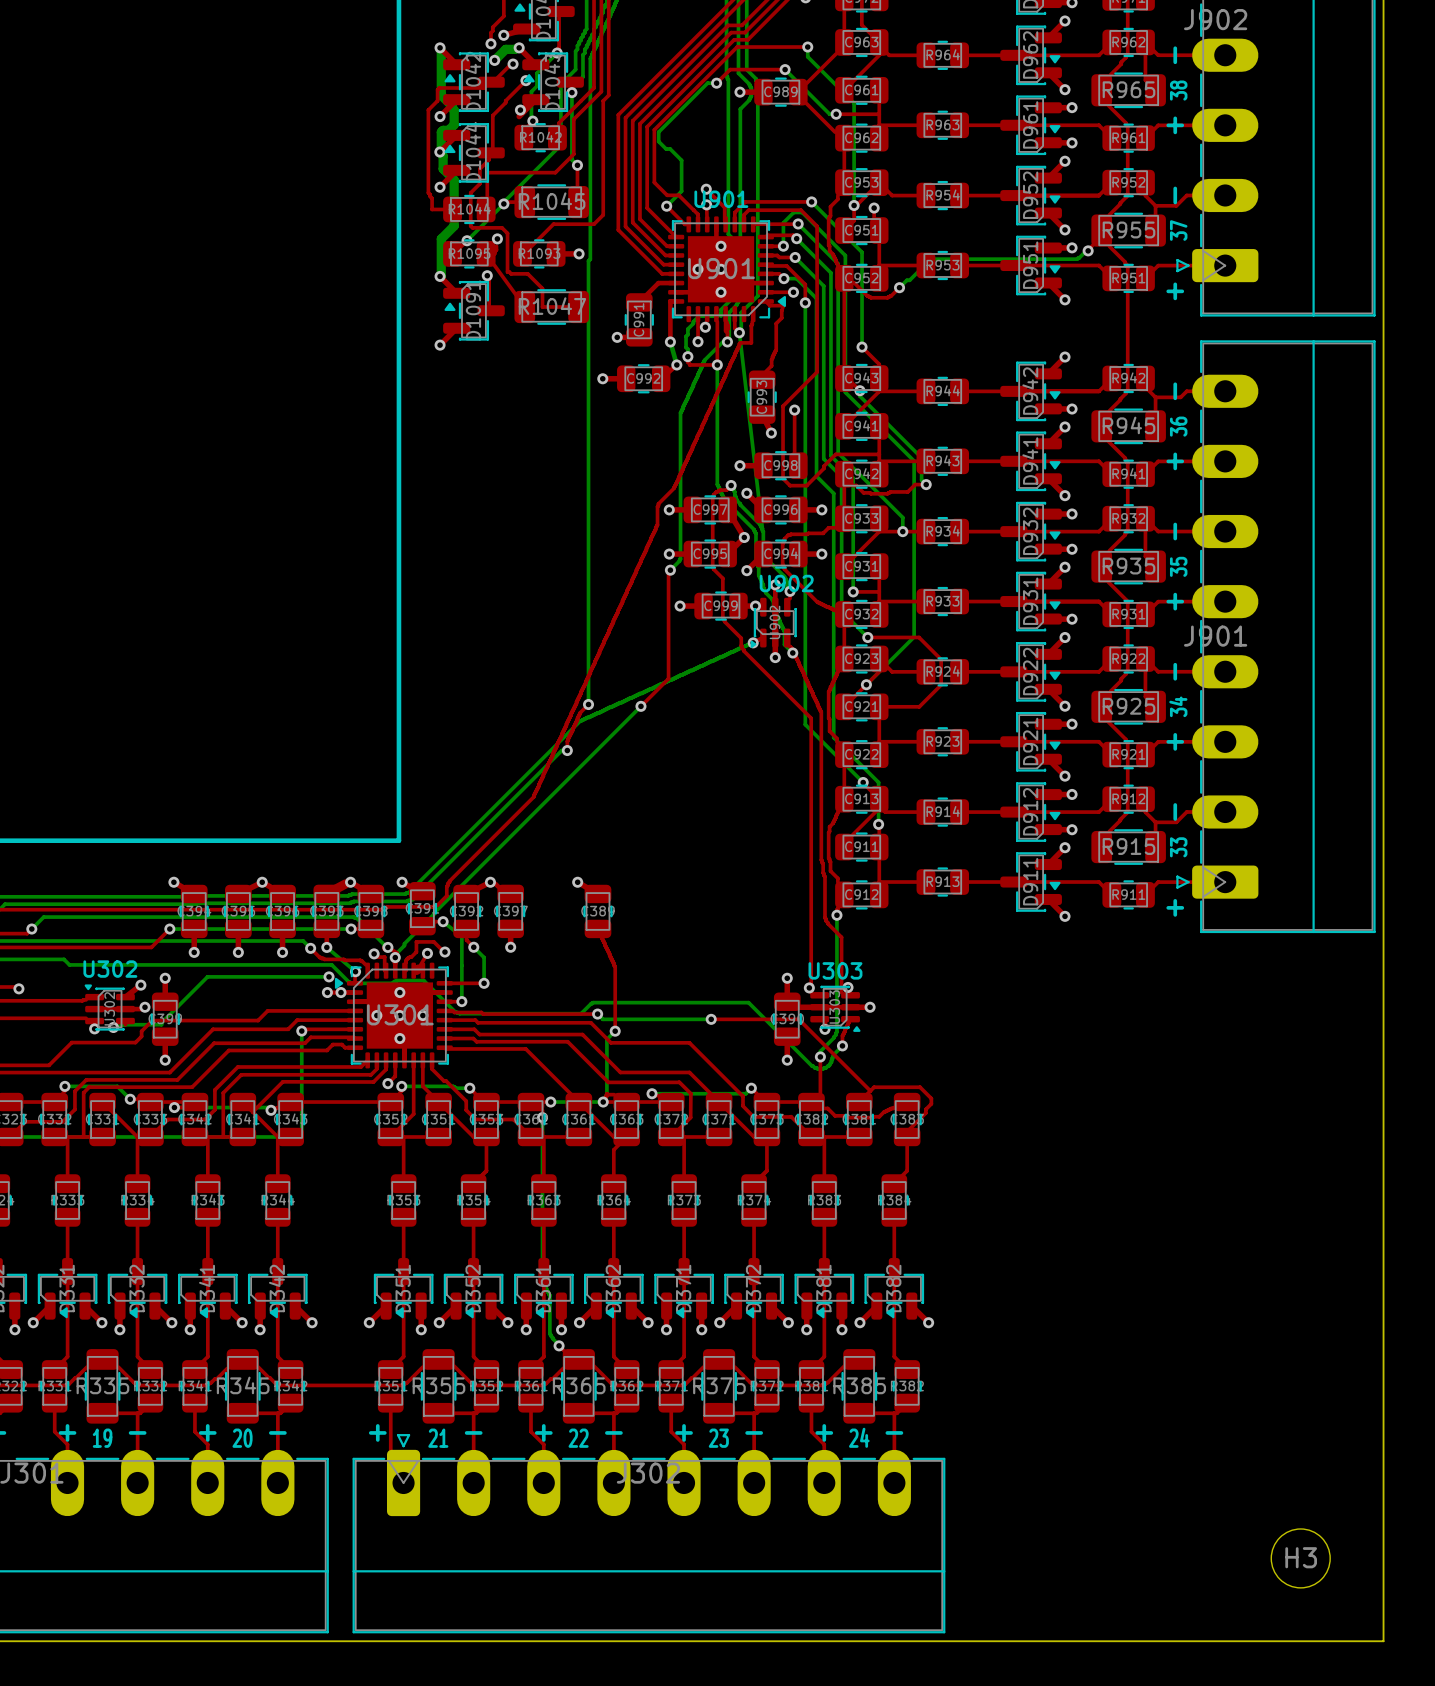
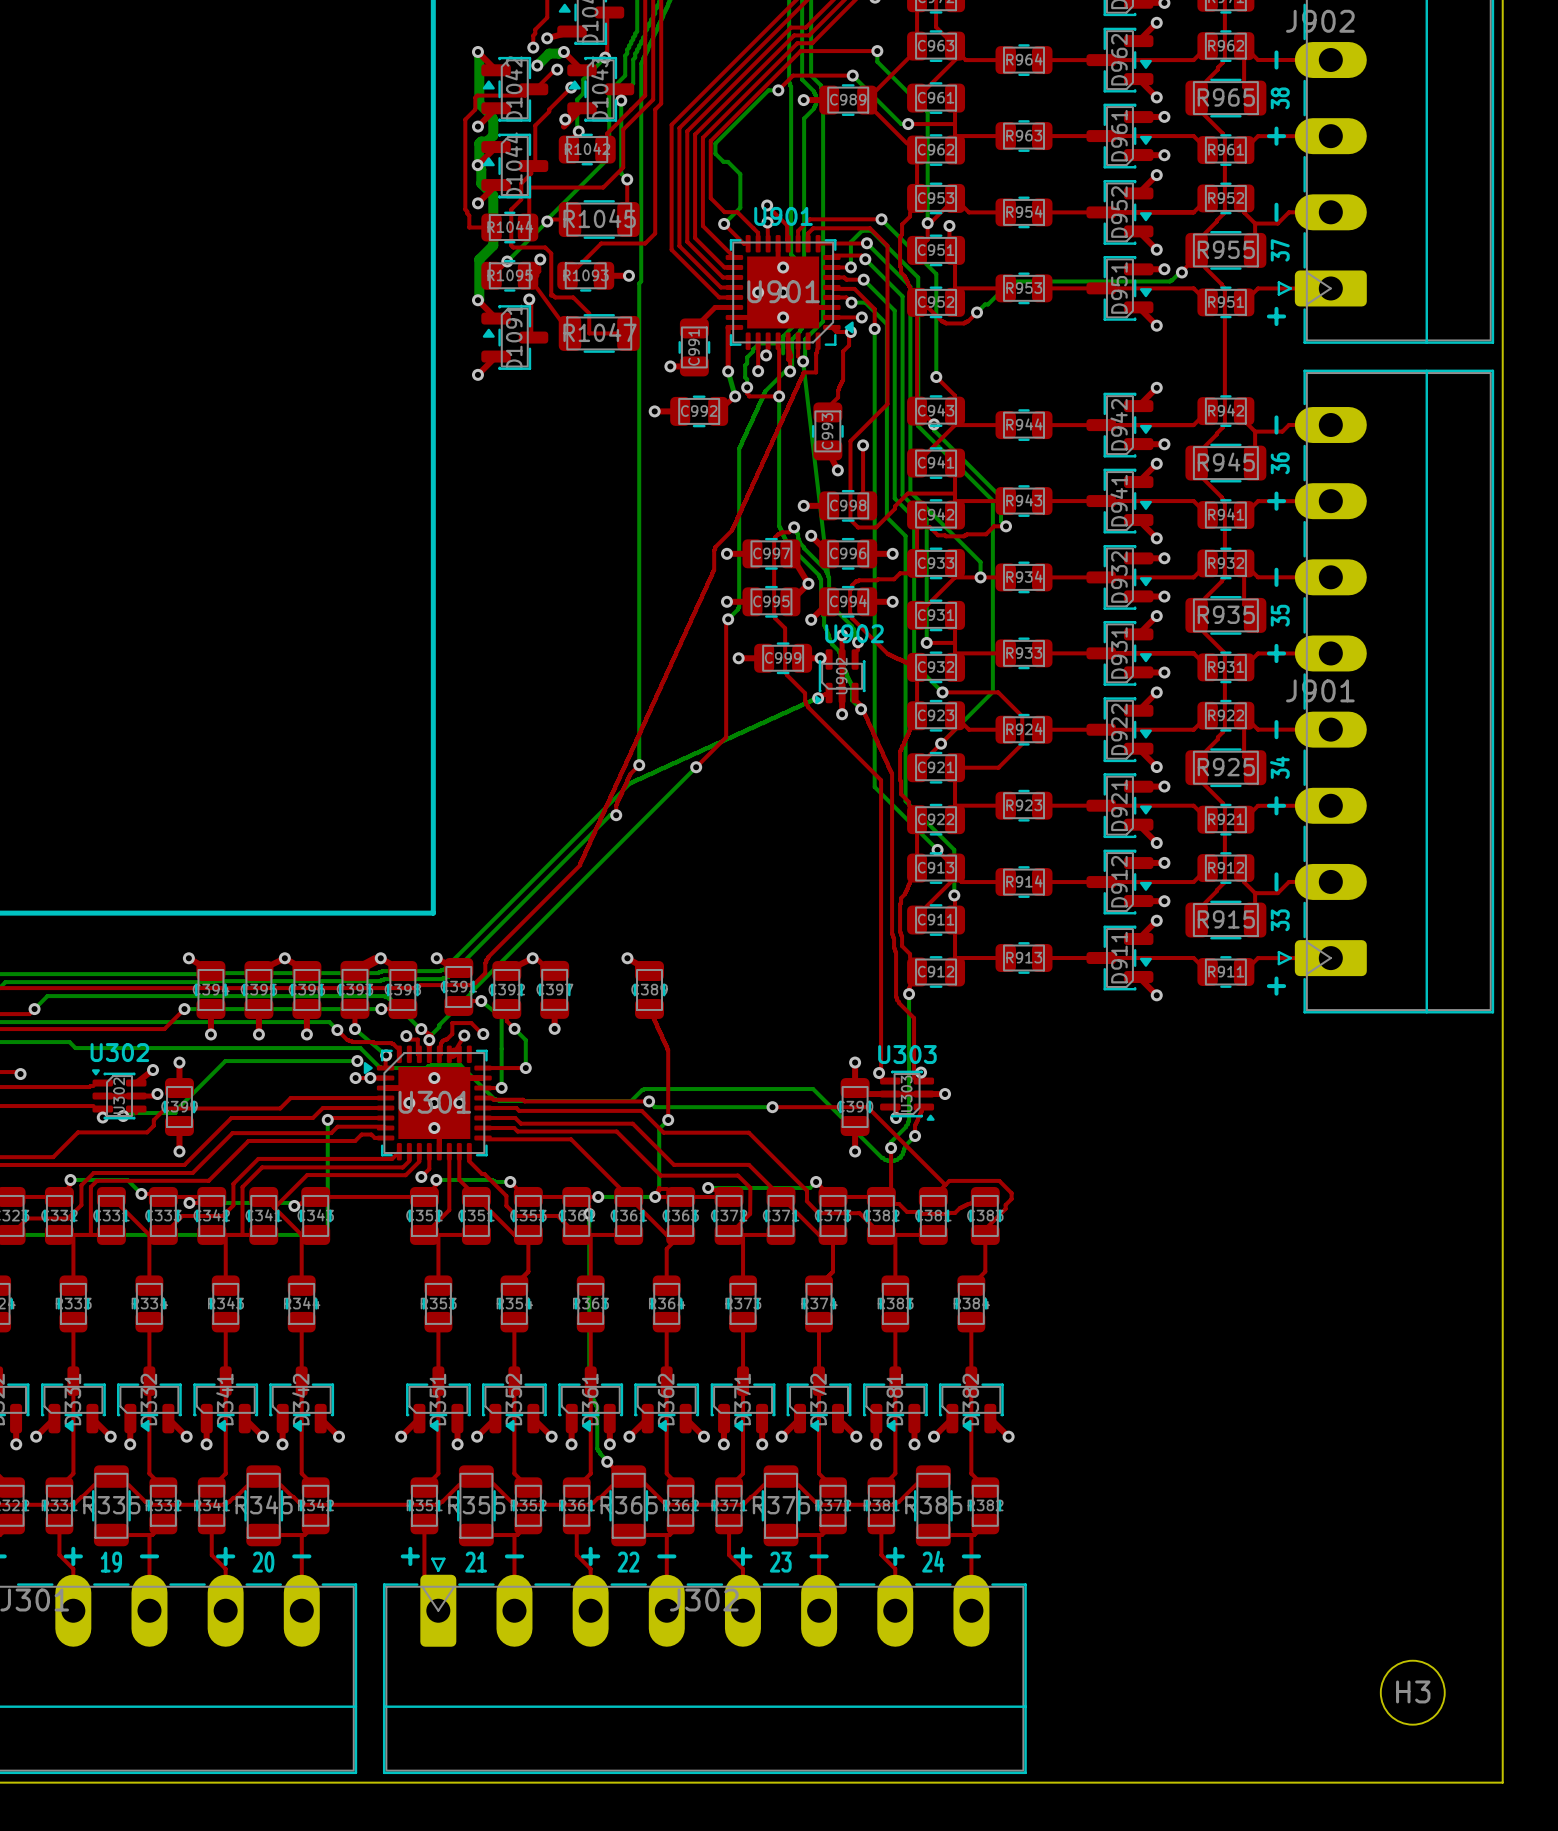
via: none -> (850, 332)
bottom track: none -> (783, 343) (783, 353)

